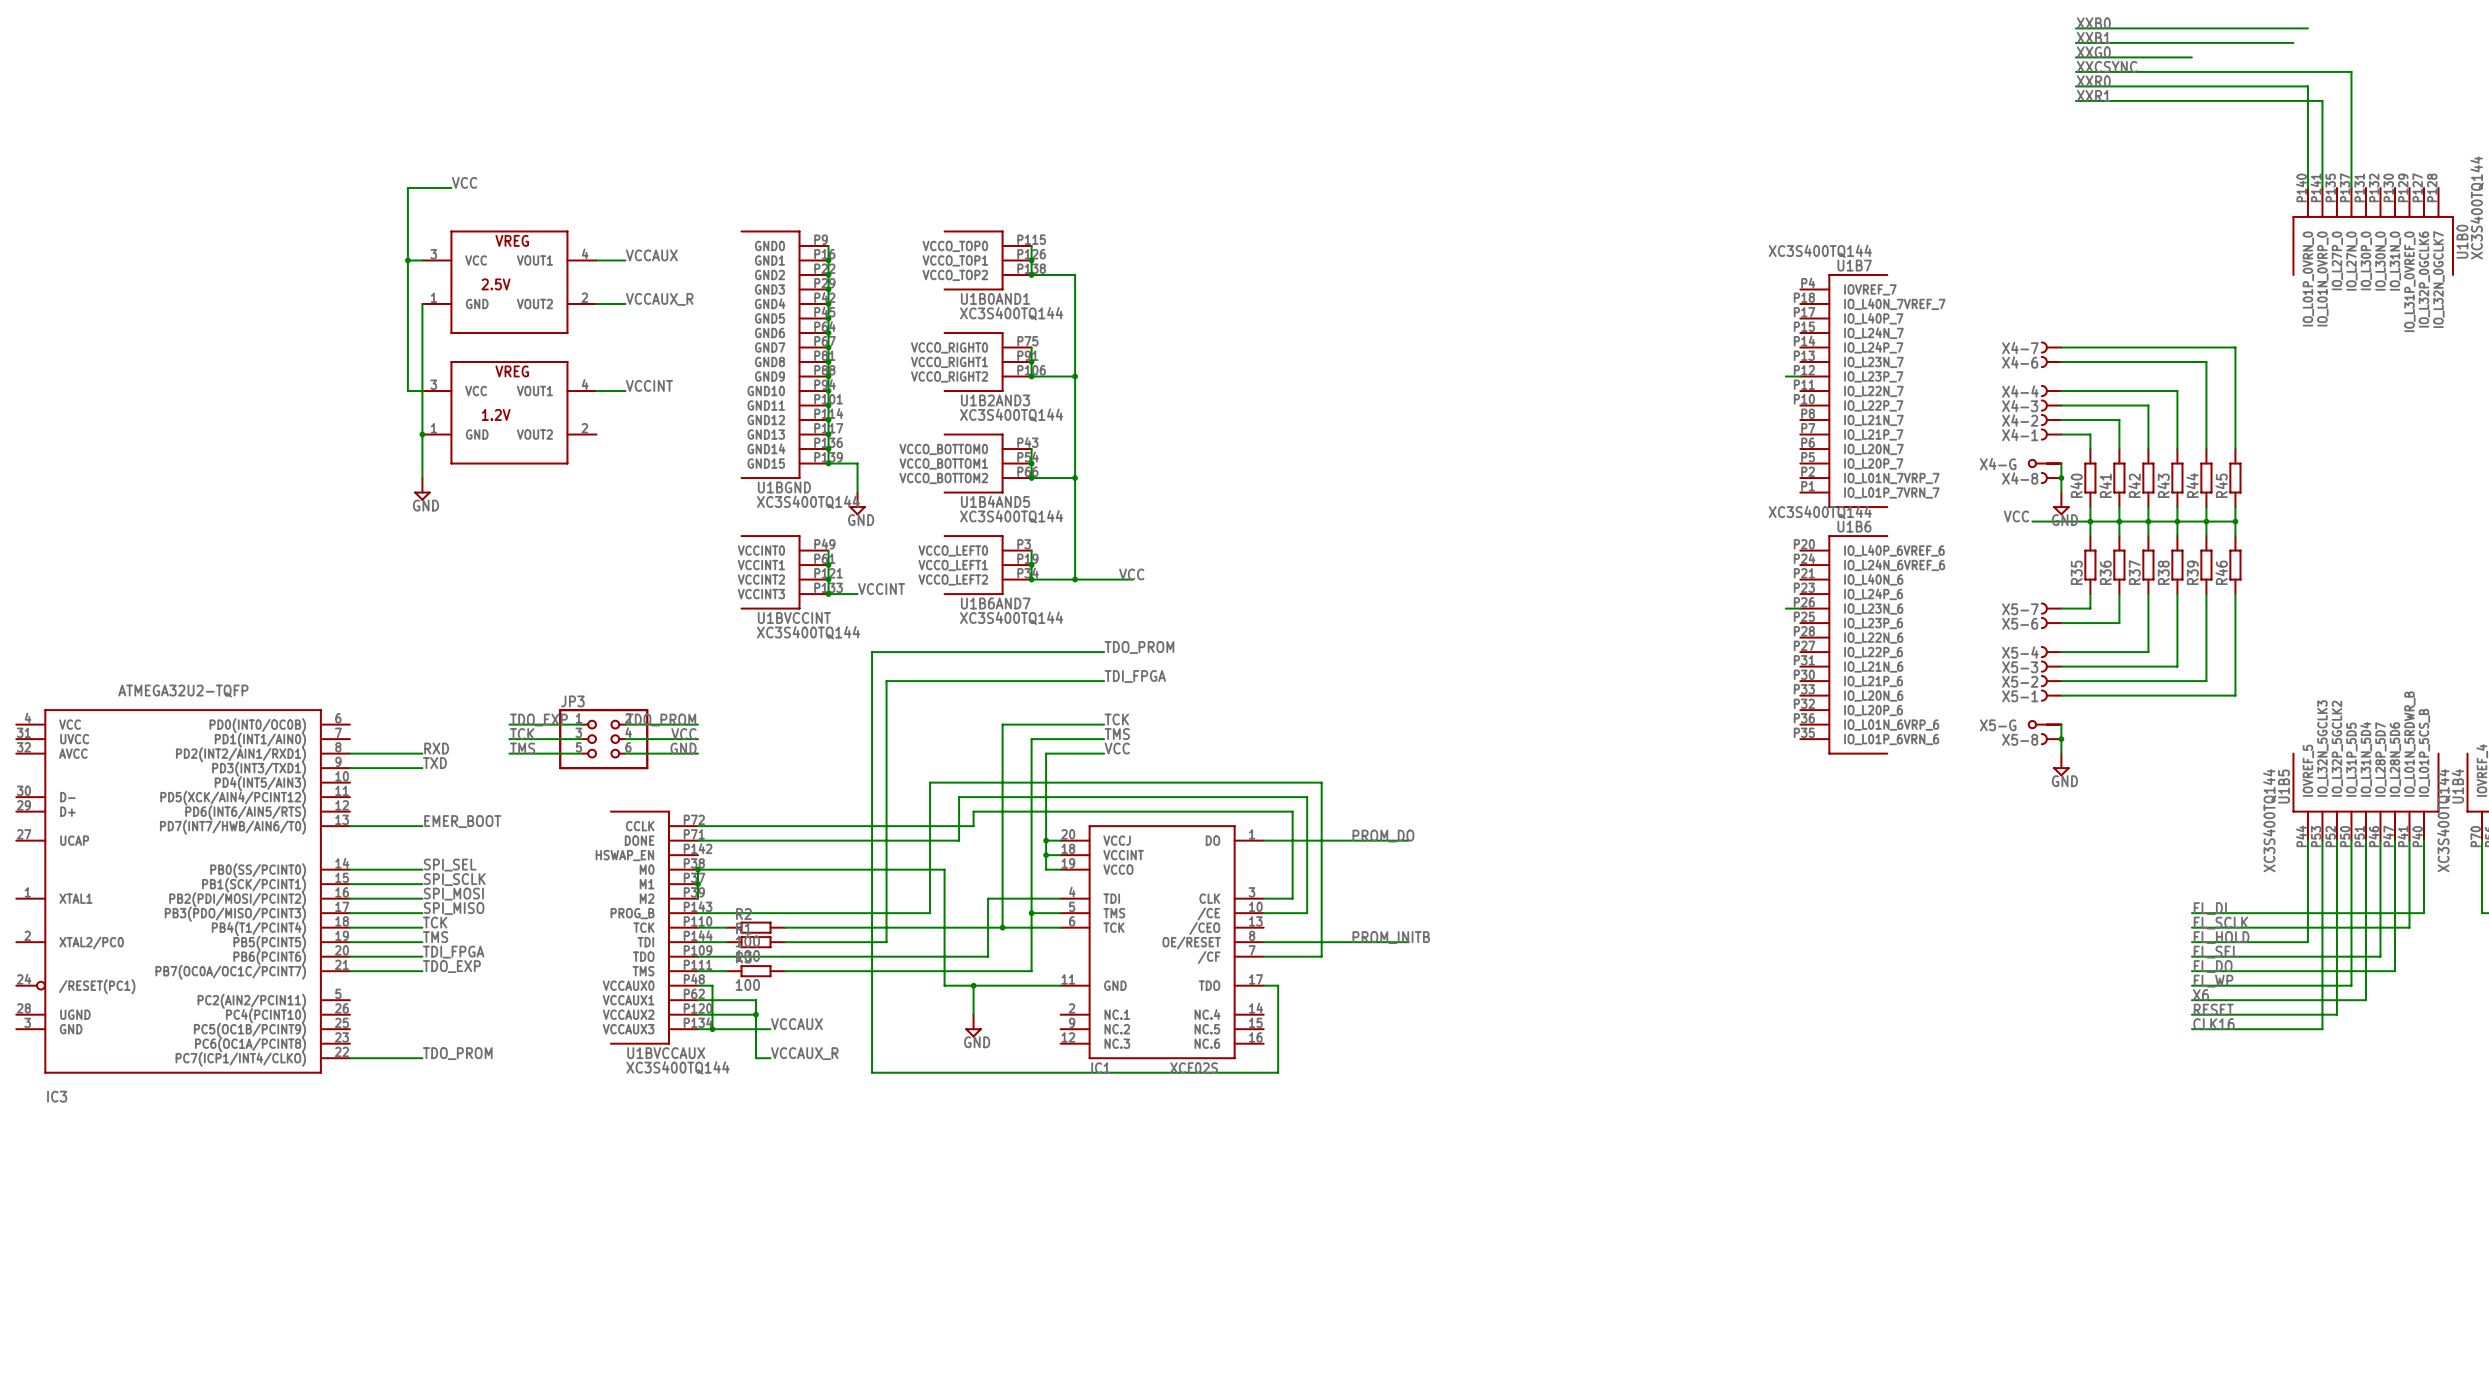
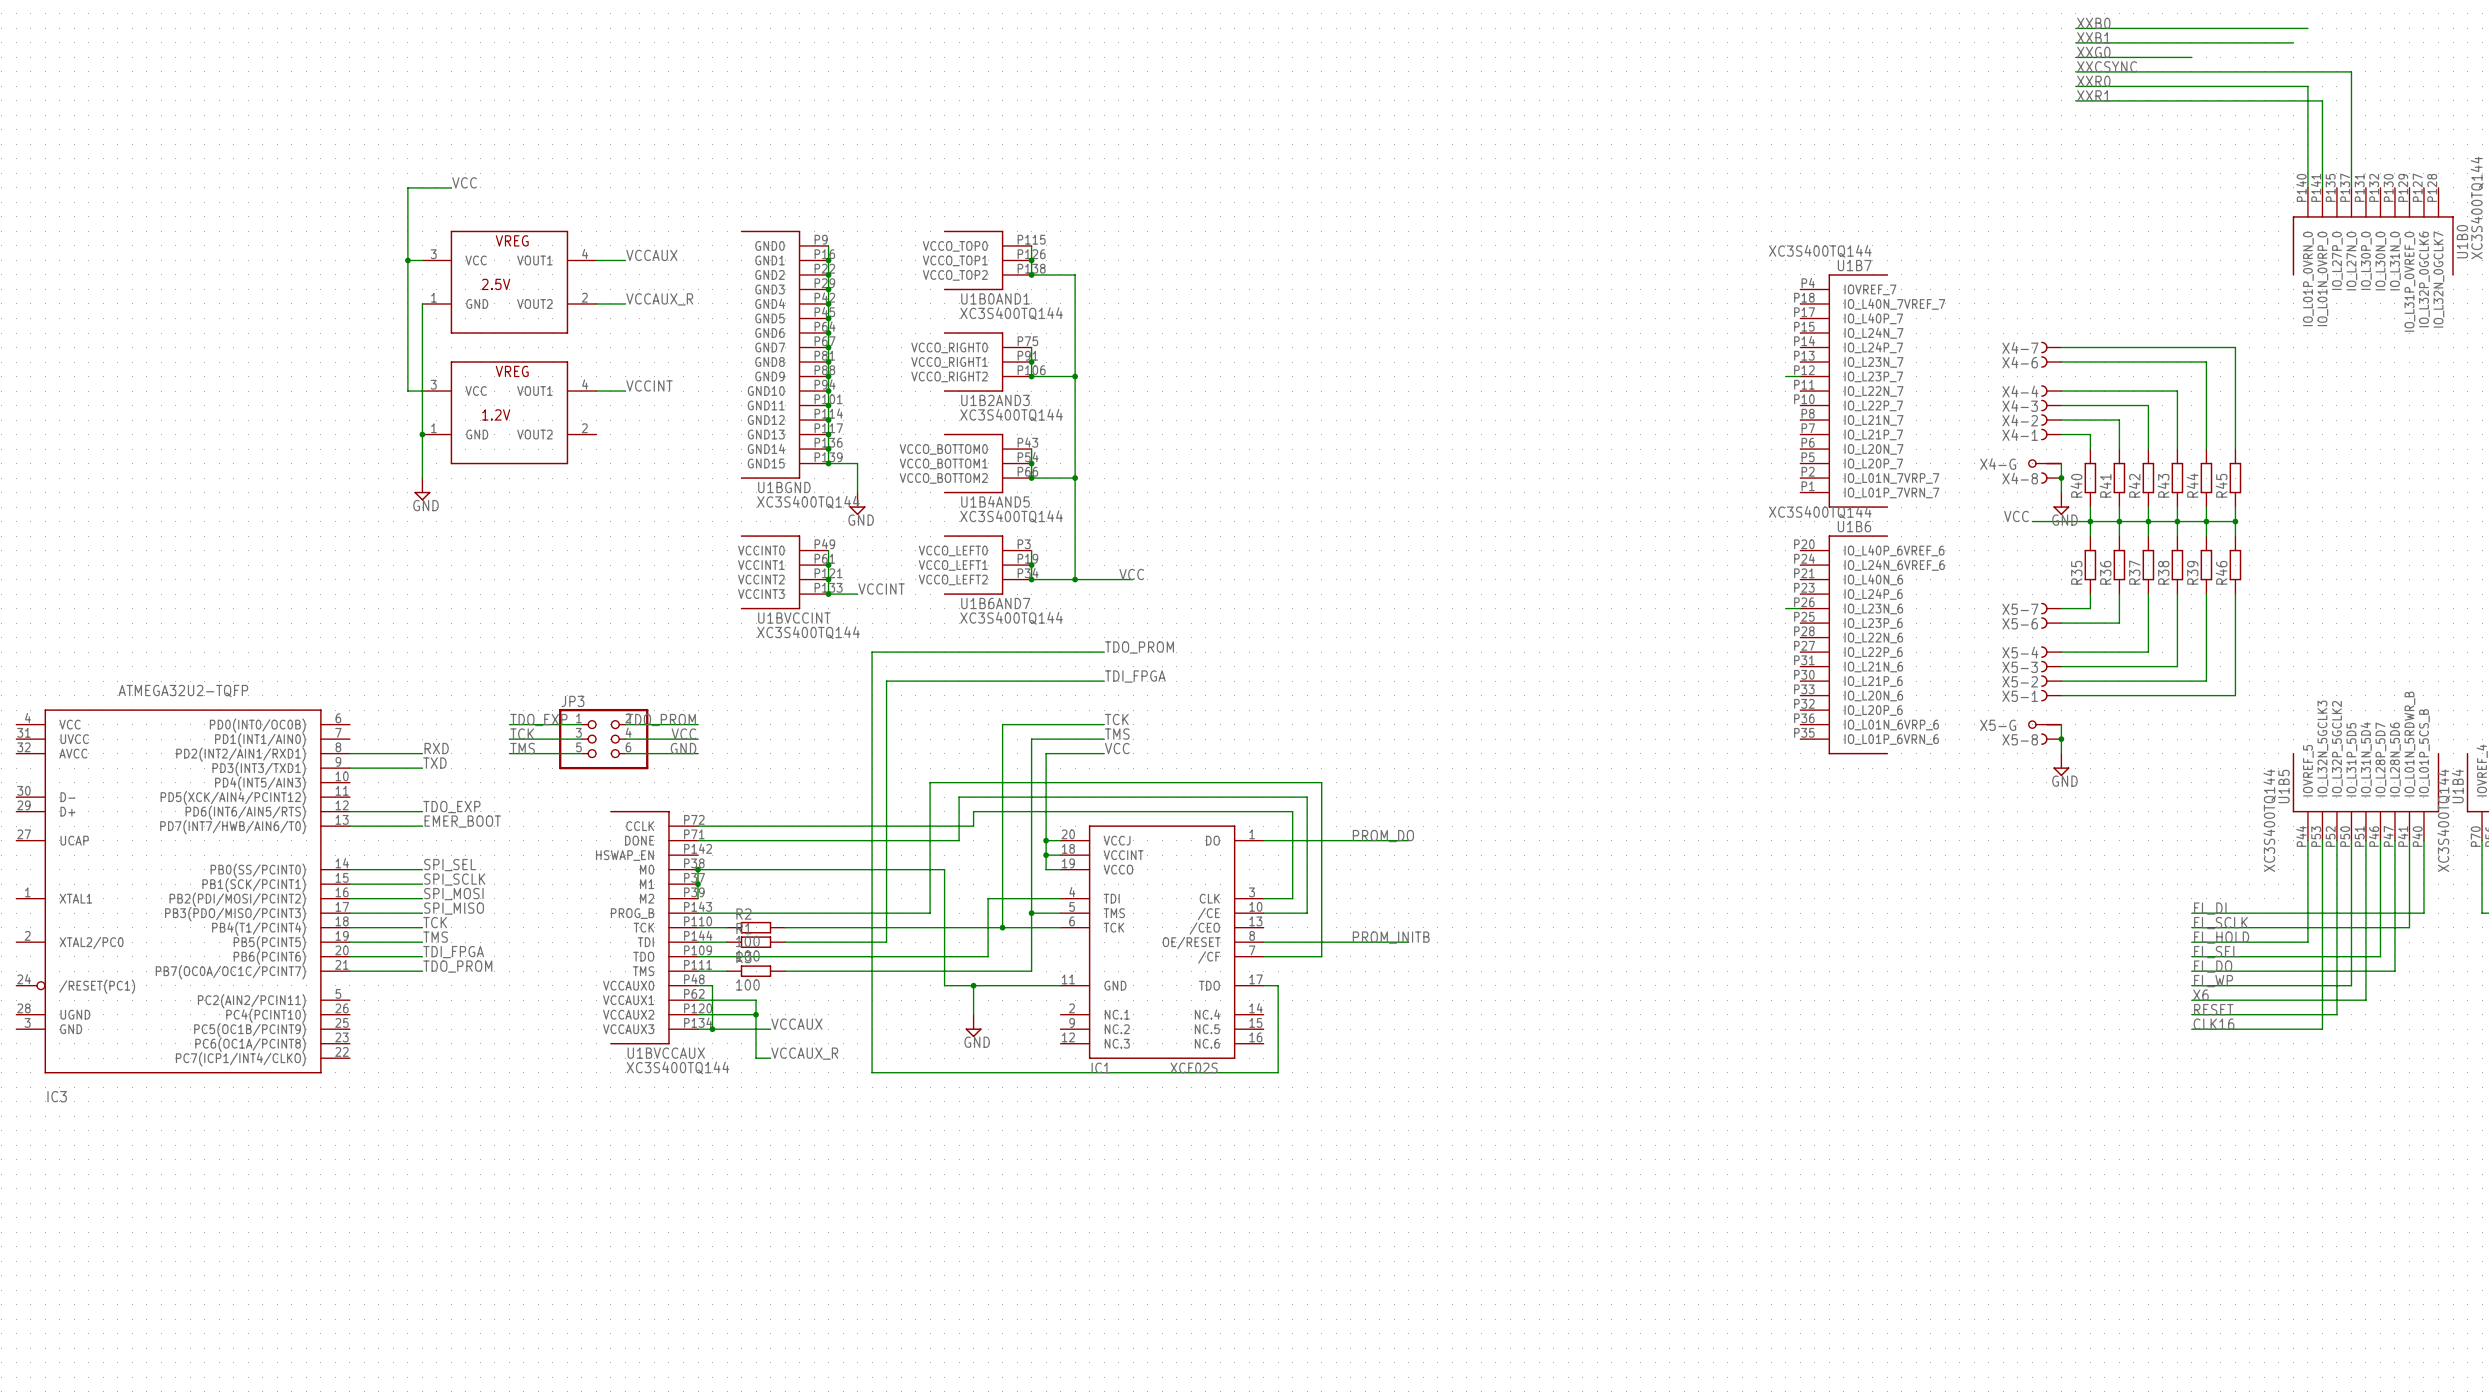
label: none -> TDO_EXP (451, 807)
wire: none -> (349, 811) (422, 811)
label: TDO_EXP (451, 966) -> TDO_PROM (457, 966)
label: TDO_PROM (457, 1053) -> none
wire: (349, 1058) (422, 1058) -> none

